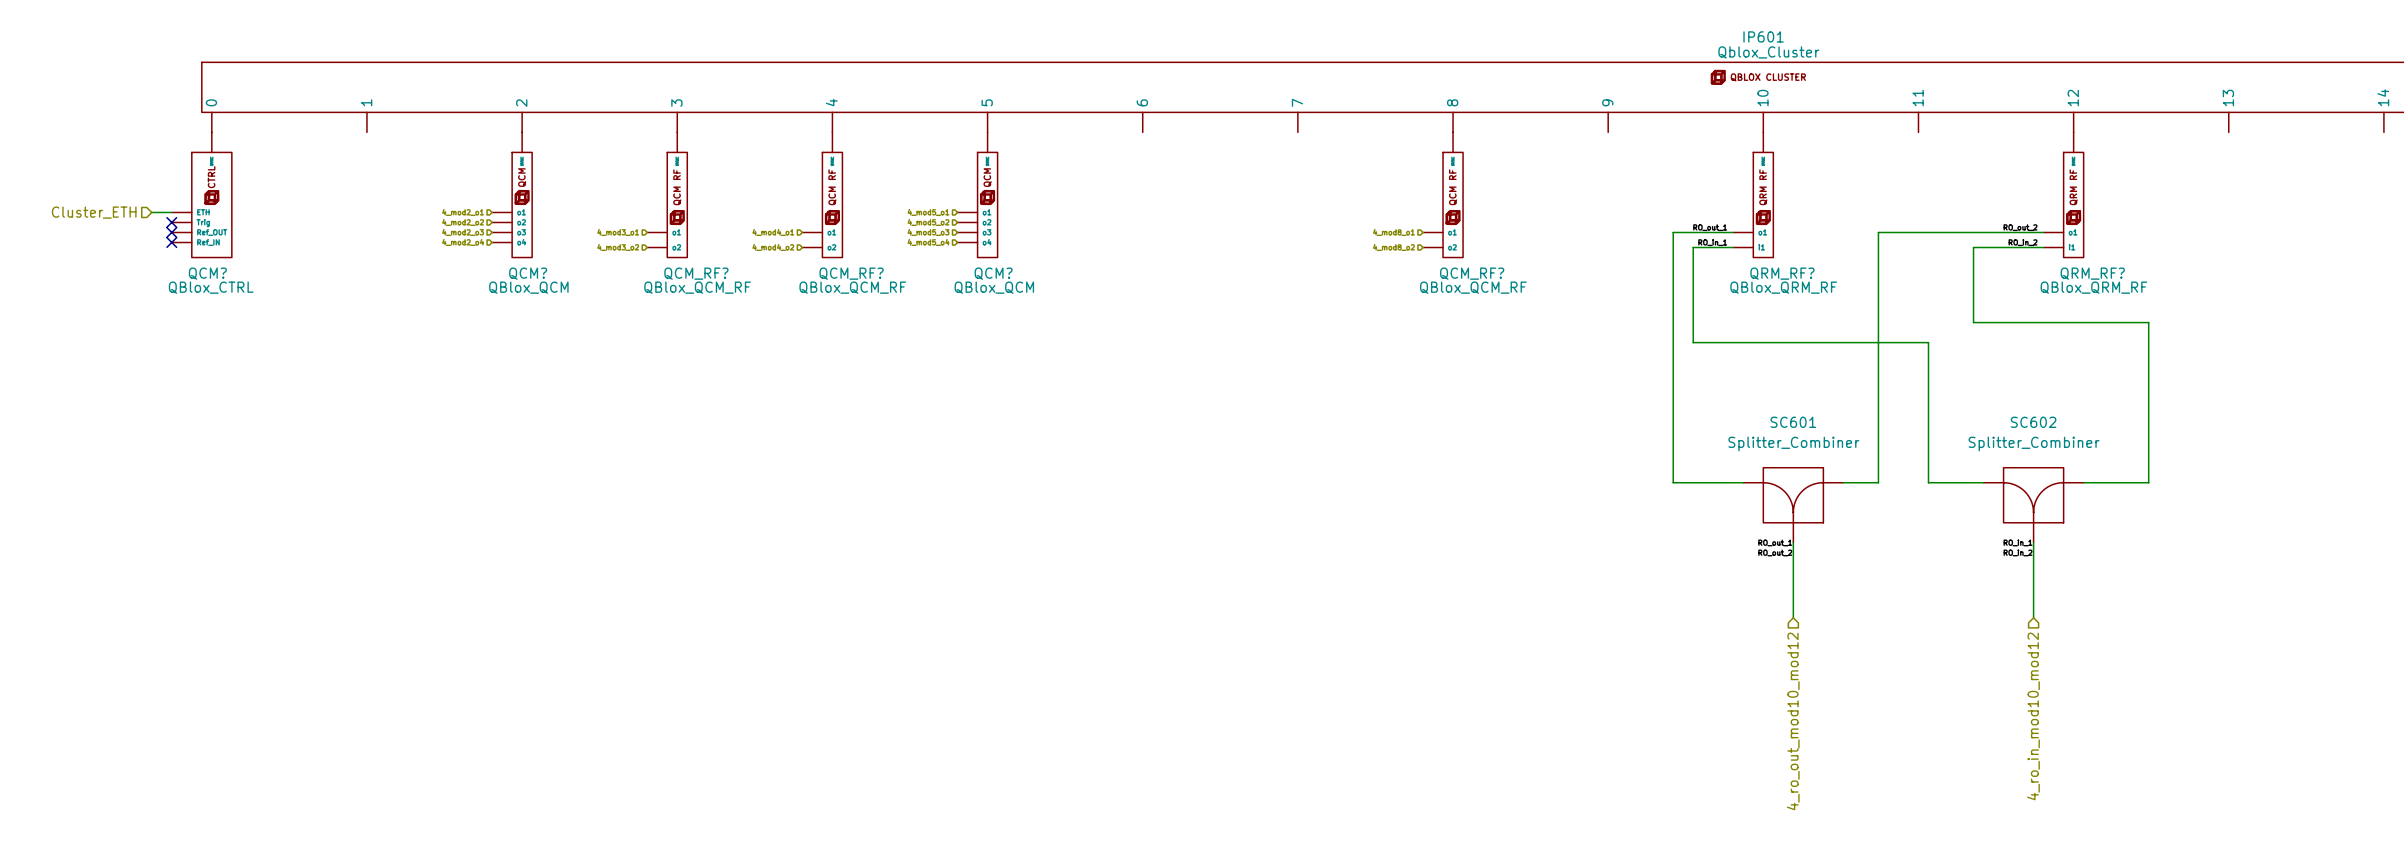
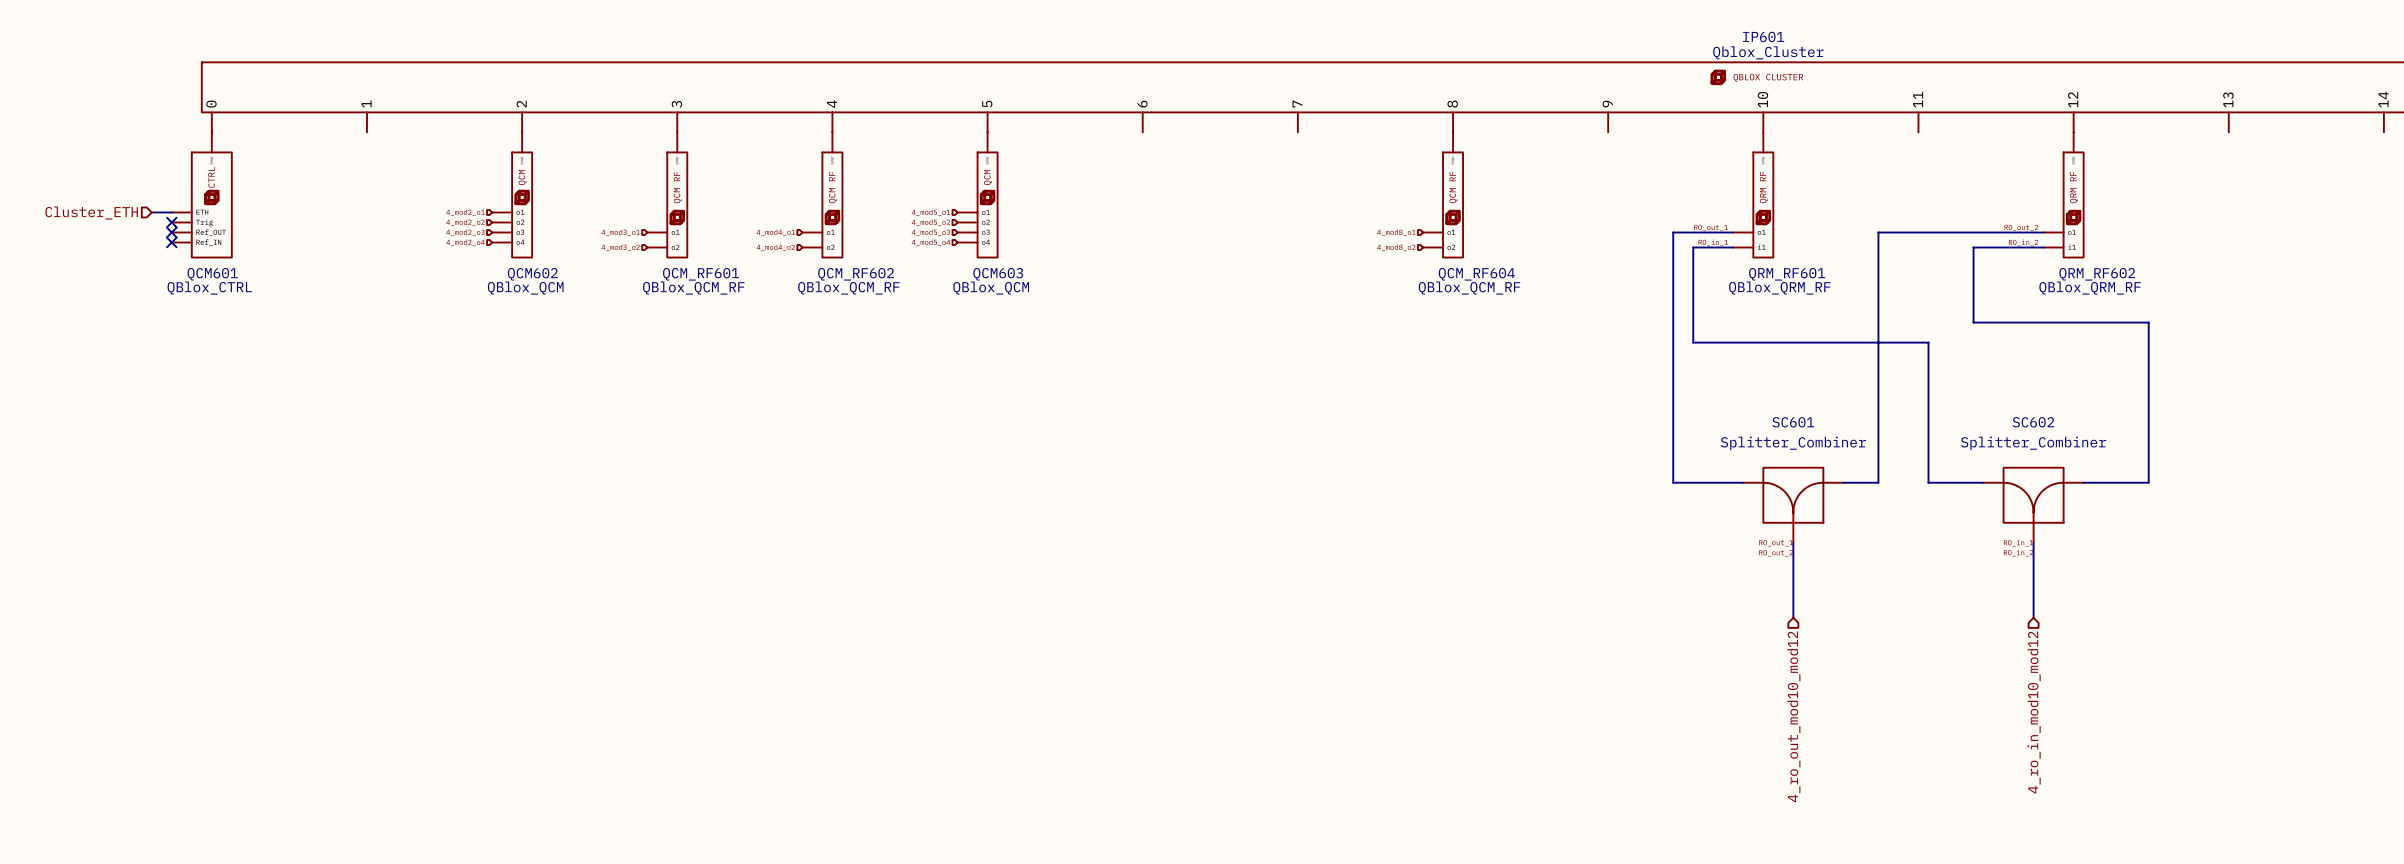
QCM? name: QCM? (207, 273) -> QCM601 (212, 274)
QCM? name: QCM? (528, 273) -> QCM602 (532, 274)
QCM_RF? name: QCM_RF? (696, 273) -> QCM_RF601 (701, 274)
QCM_RF? name: QCM_RF? (851, 273) -> QCM_RF602 (856, 274)
QCM? name: QCM? (993, 273) -> QCM603 (998, 274)
QCM_RF? name: QCM_RF? (1472, 273) -> QCM_RF604 (1476, 274)
QRM_RF? name: QRM_RF? (1782, 273) -> QRM_RF601 (1787, 274)
QRM_RF? name: QRM_RF? (2092, 273) -> QRM_RF602 (2097, 274)

